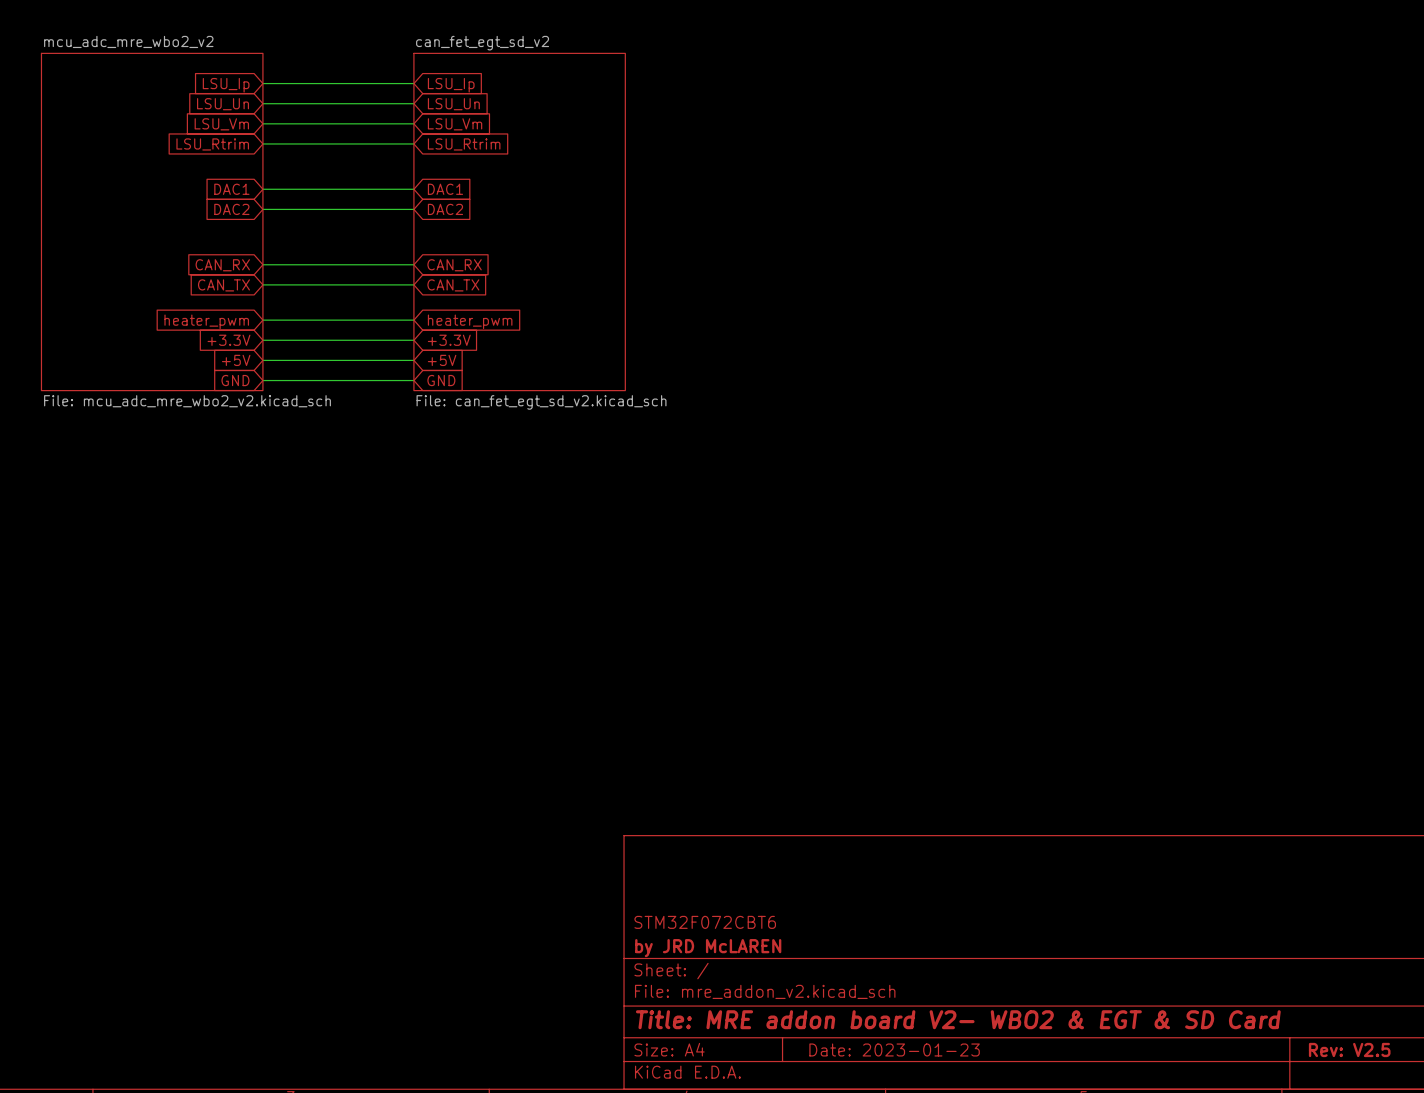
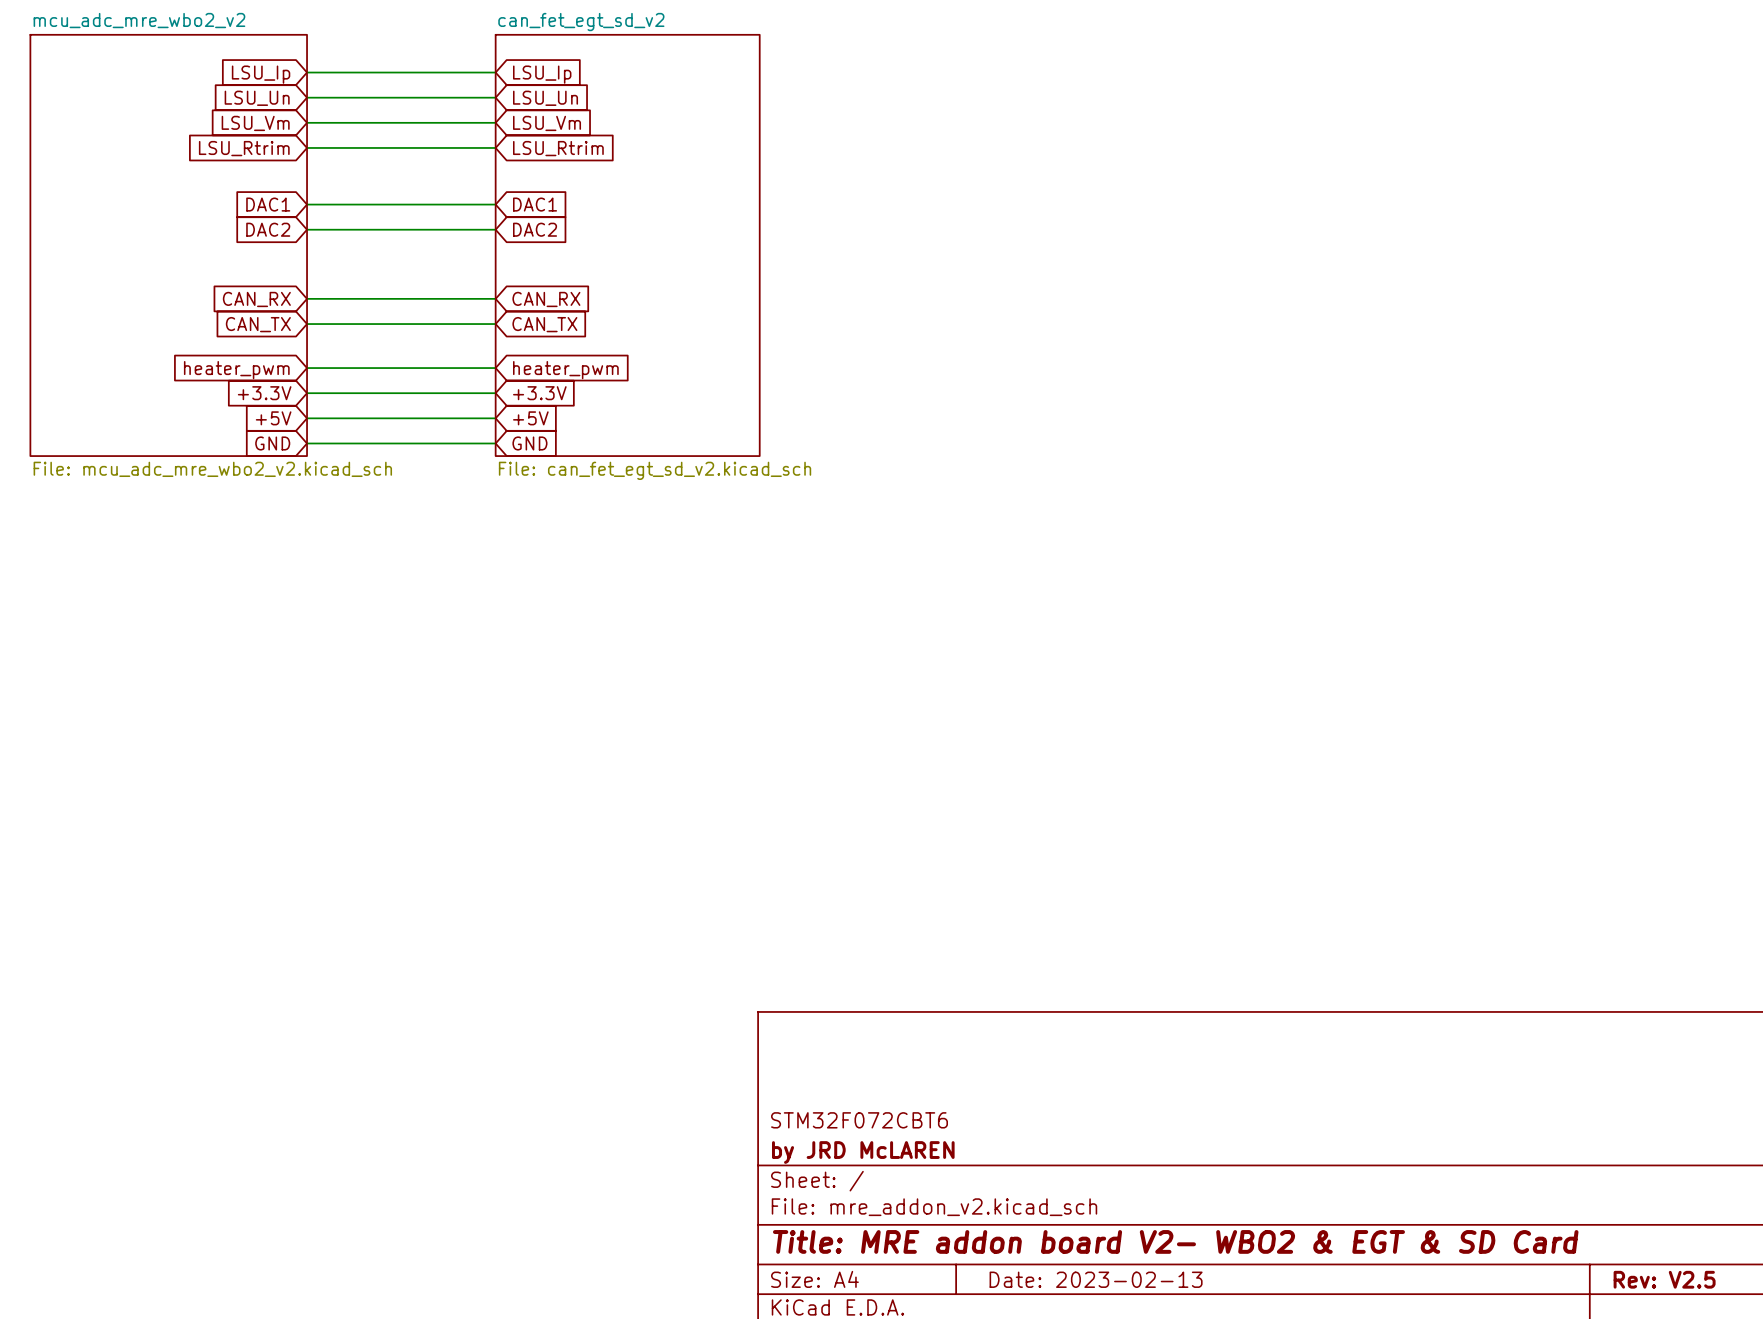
title block: Date: 2023-01-23 (894, 1049) -> Date: 2023-02-13 (1096, 1279)

